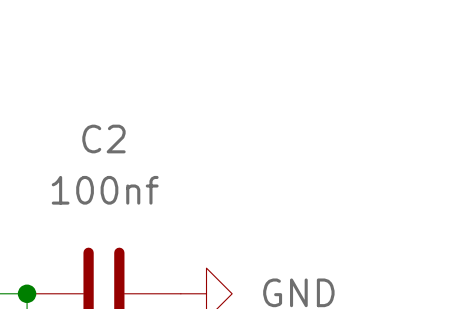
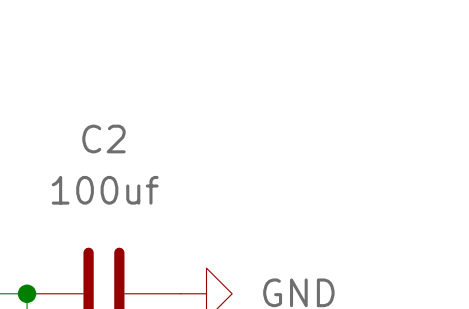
C2 value: 100nf (105, 190) -> 100uf (105, 190)

